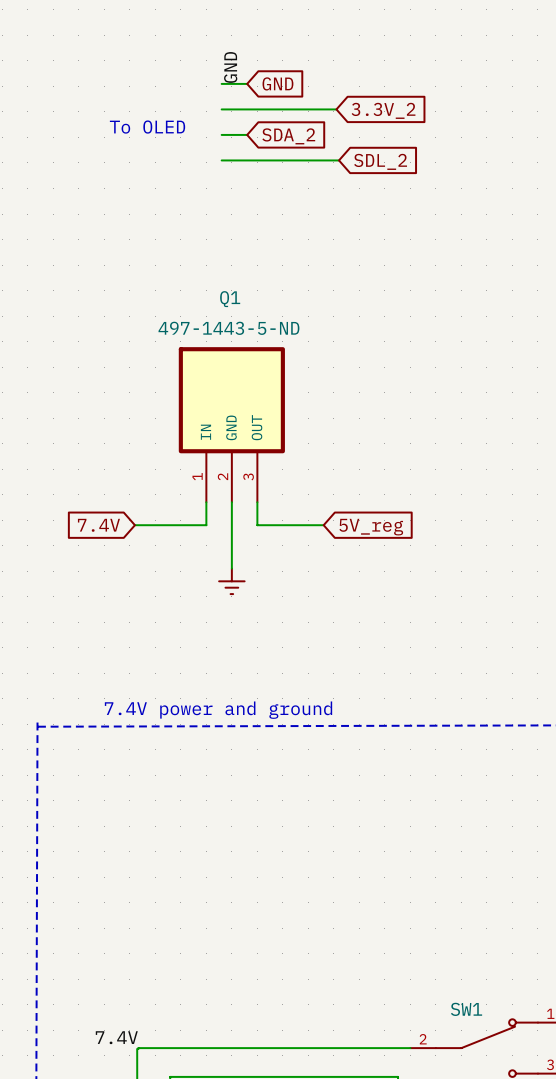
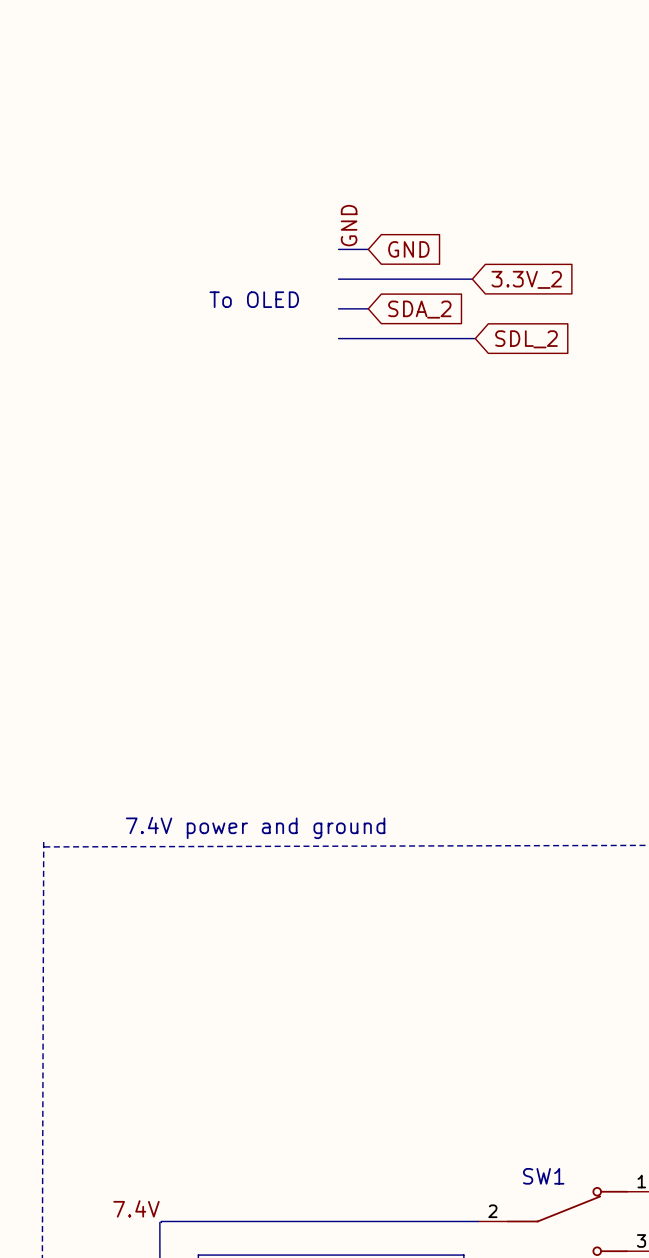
label position: GND (230, 67) -> GND (349, 225)
wire: (221, 83) (247, 83) -> (338, 249) (368, 249)
global label position: GND (277, 83) -> GND (408, 249)
wire: (221, 109) (336, 109) -> (338, 279) (472, 279)
global label position: 3.3V_2 (383, 110) -> 3.3V_2 (526, 279)
text position: To OLED (147, 127) -> To OLED (254, 299)
wire: (221, 134) (247, 134) -> (338, 308) (368, 308)
global label position: SDA_2 (288, 136) -> SDA_2 (419, 309)
wire: (221, 160) (339, 160) -> (338, 338) (475, 338)
global label position: SDL_2 (380, 161) -> SDL_2 (526, 339)
Q1: 497-1443-5-ND (231, 424) -> none
wire: (206, 502) (206, 525) (134, 525) -> none
wire: (231, 502) (231, 568) -> none
wire: (257, 502) (257, 525) (323, 525) -> none
global label: 7.4V (98, 525) -> none
global label: 5V_reg (371, 527) -> none
power symbol: (231, 581) -> none

